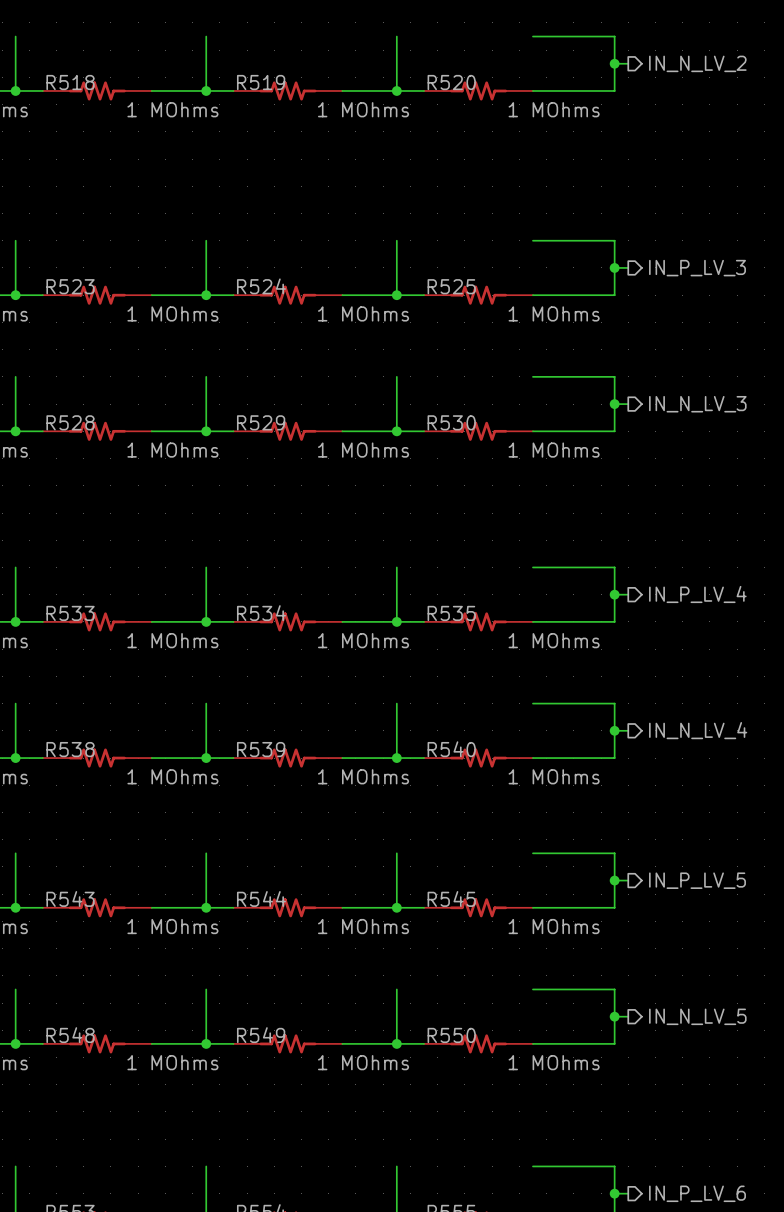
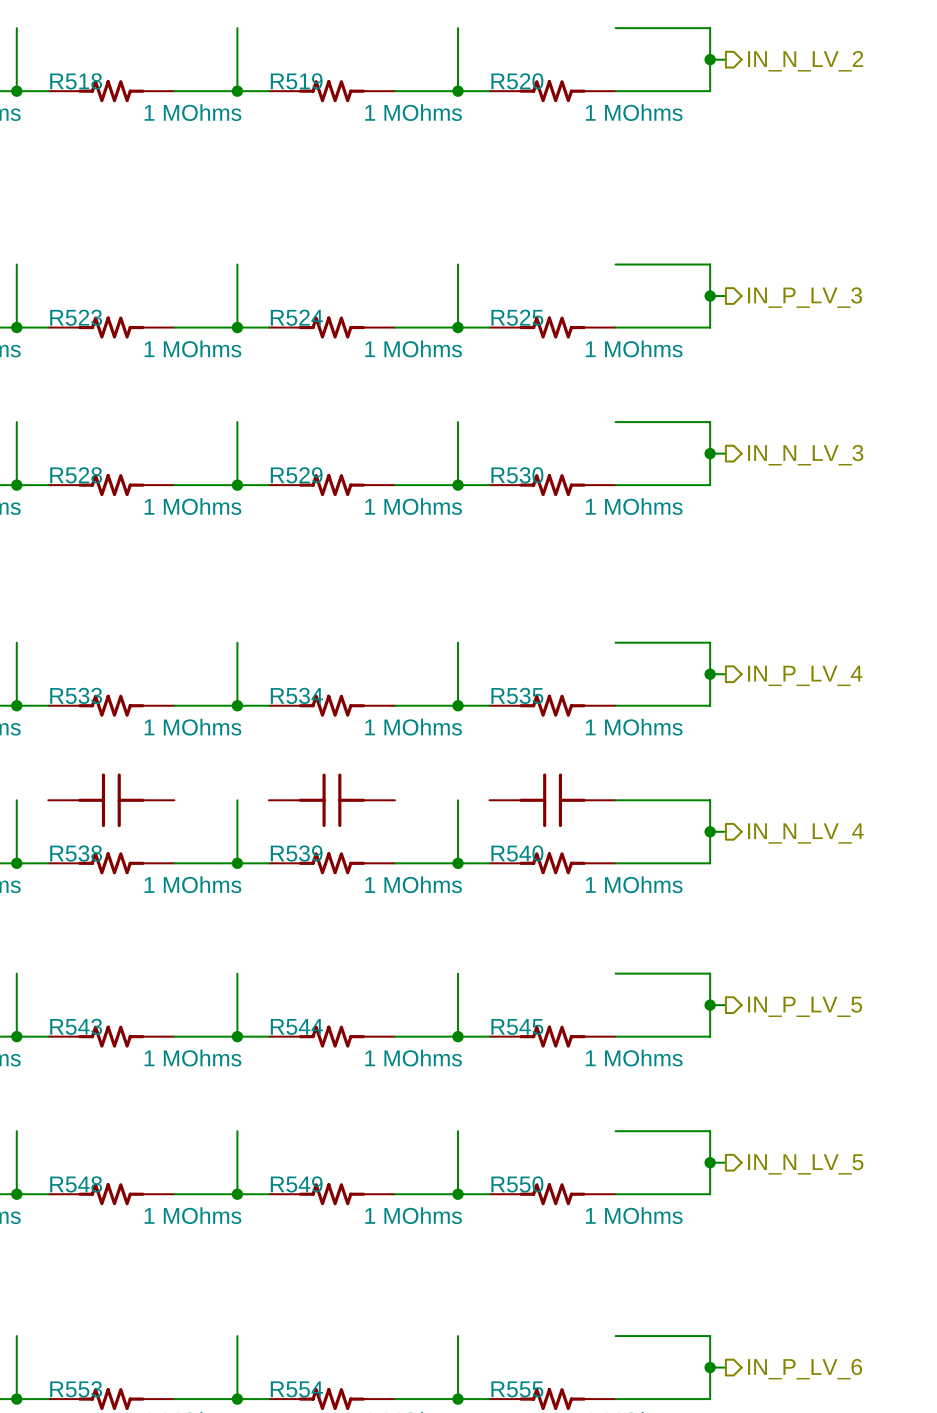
part: none -> (111, 800)
part: none -> (331, 800)
part: none -> (552, 800)

